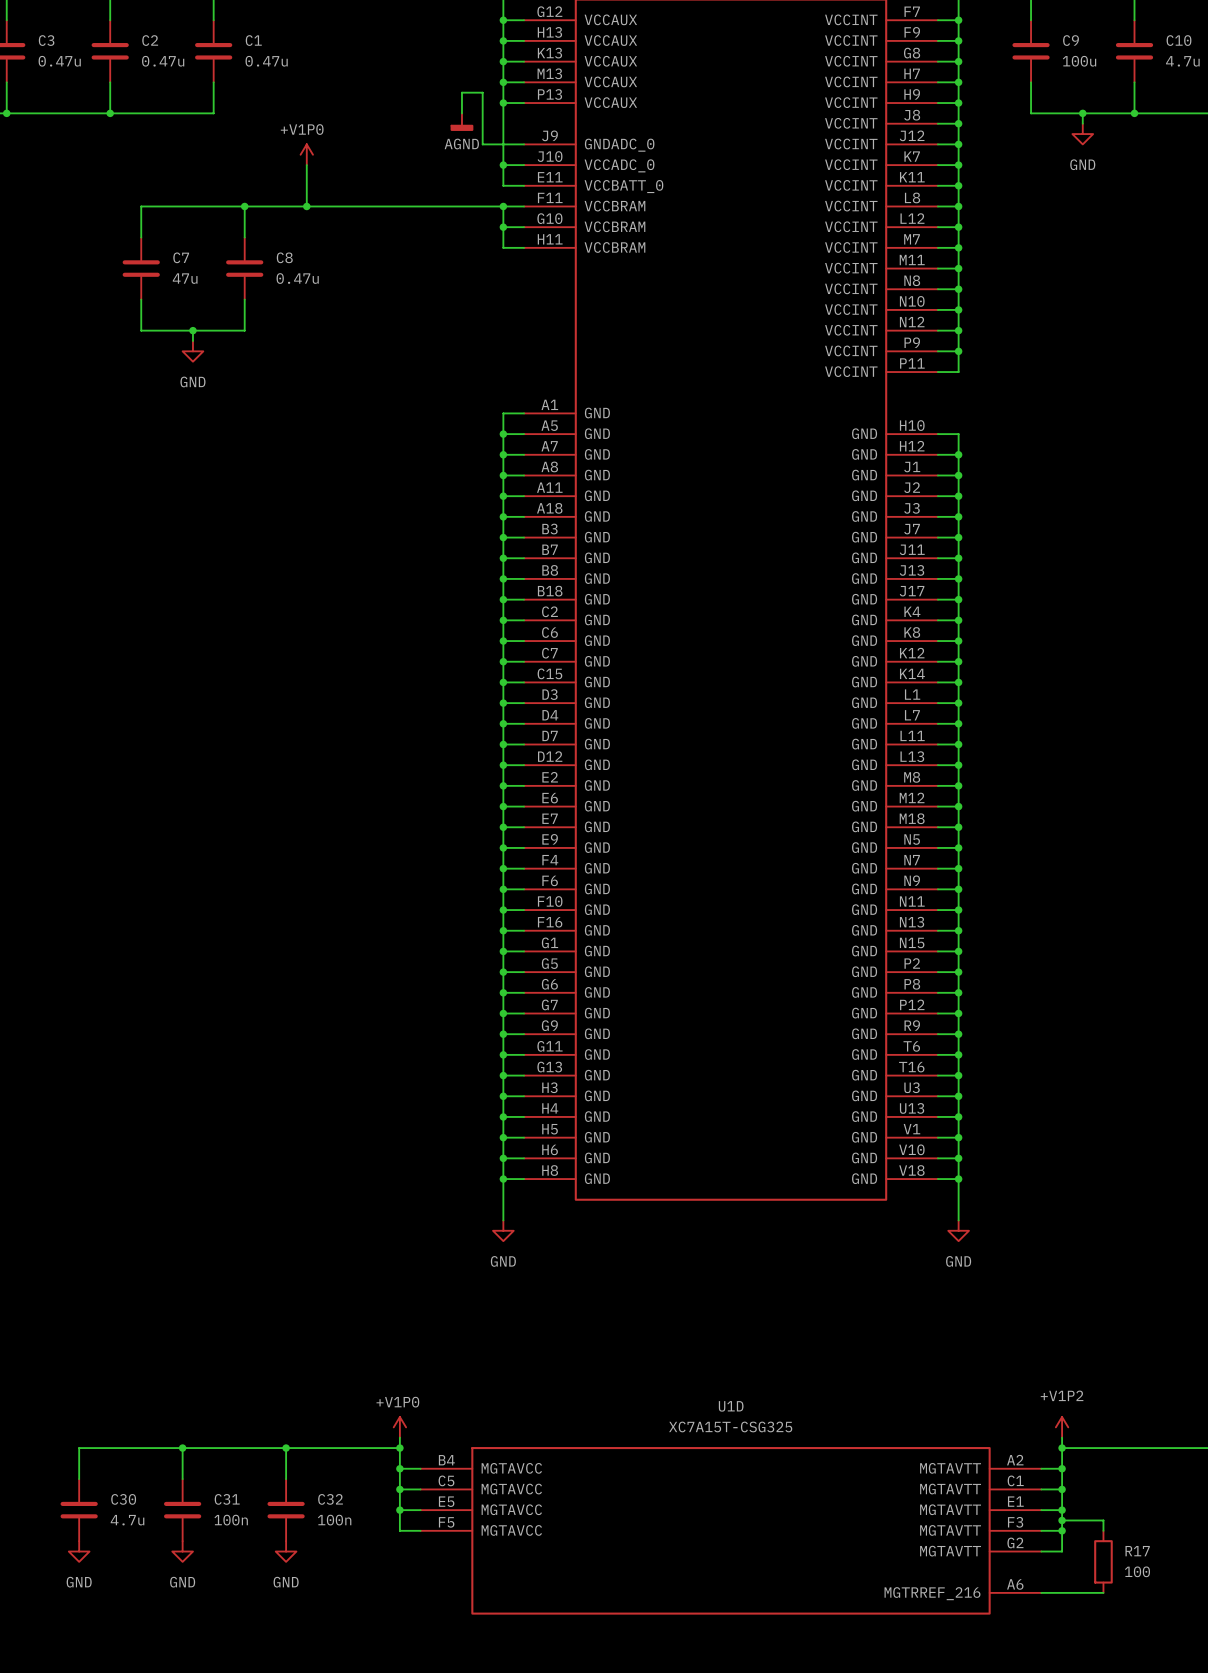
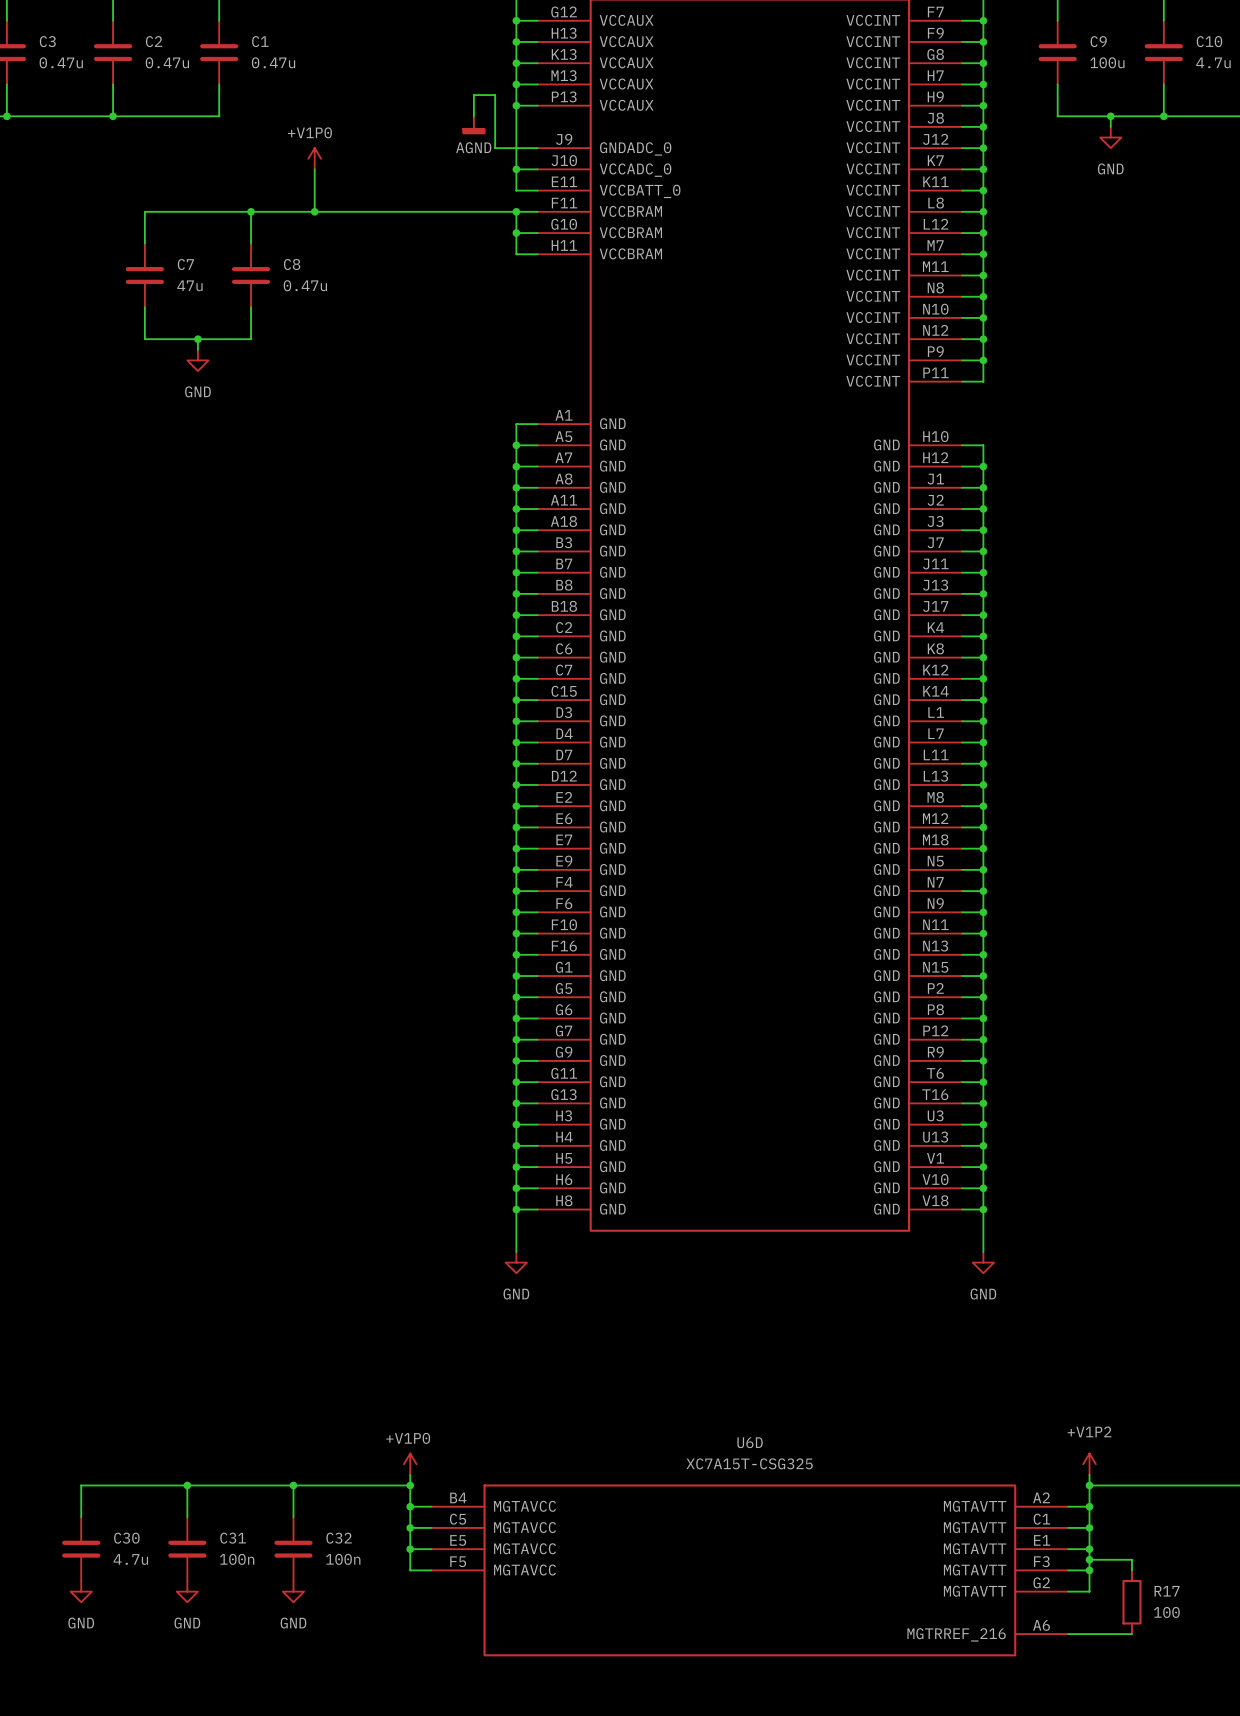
U1D name: U1D (731, 1406) -> U6D (750, 1442)

